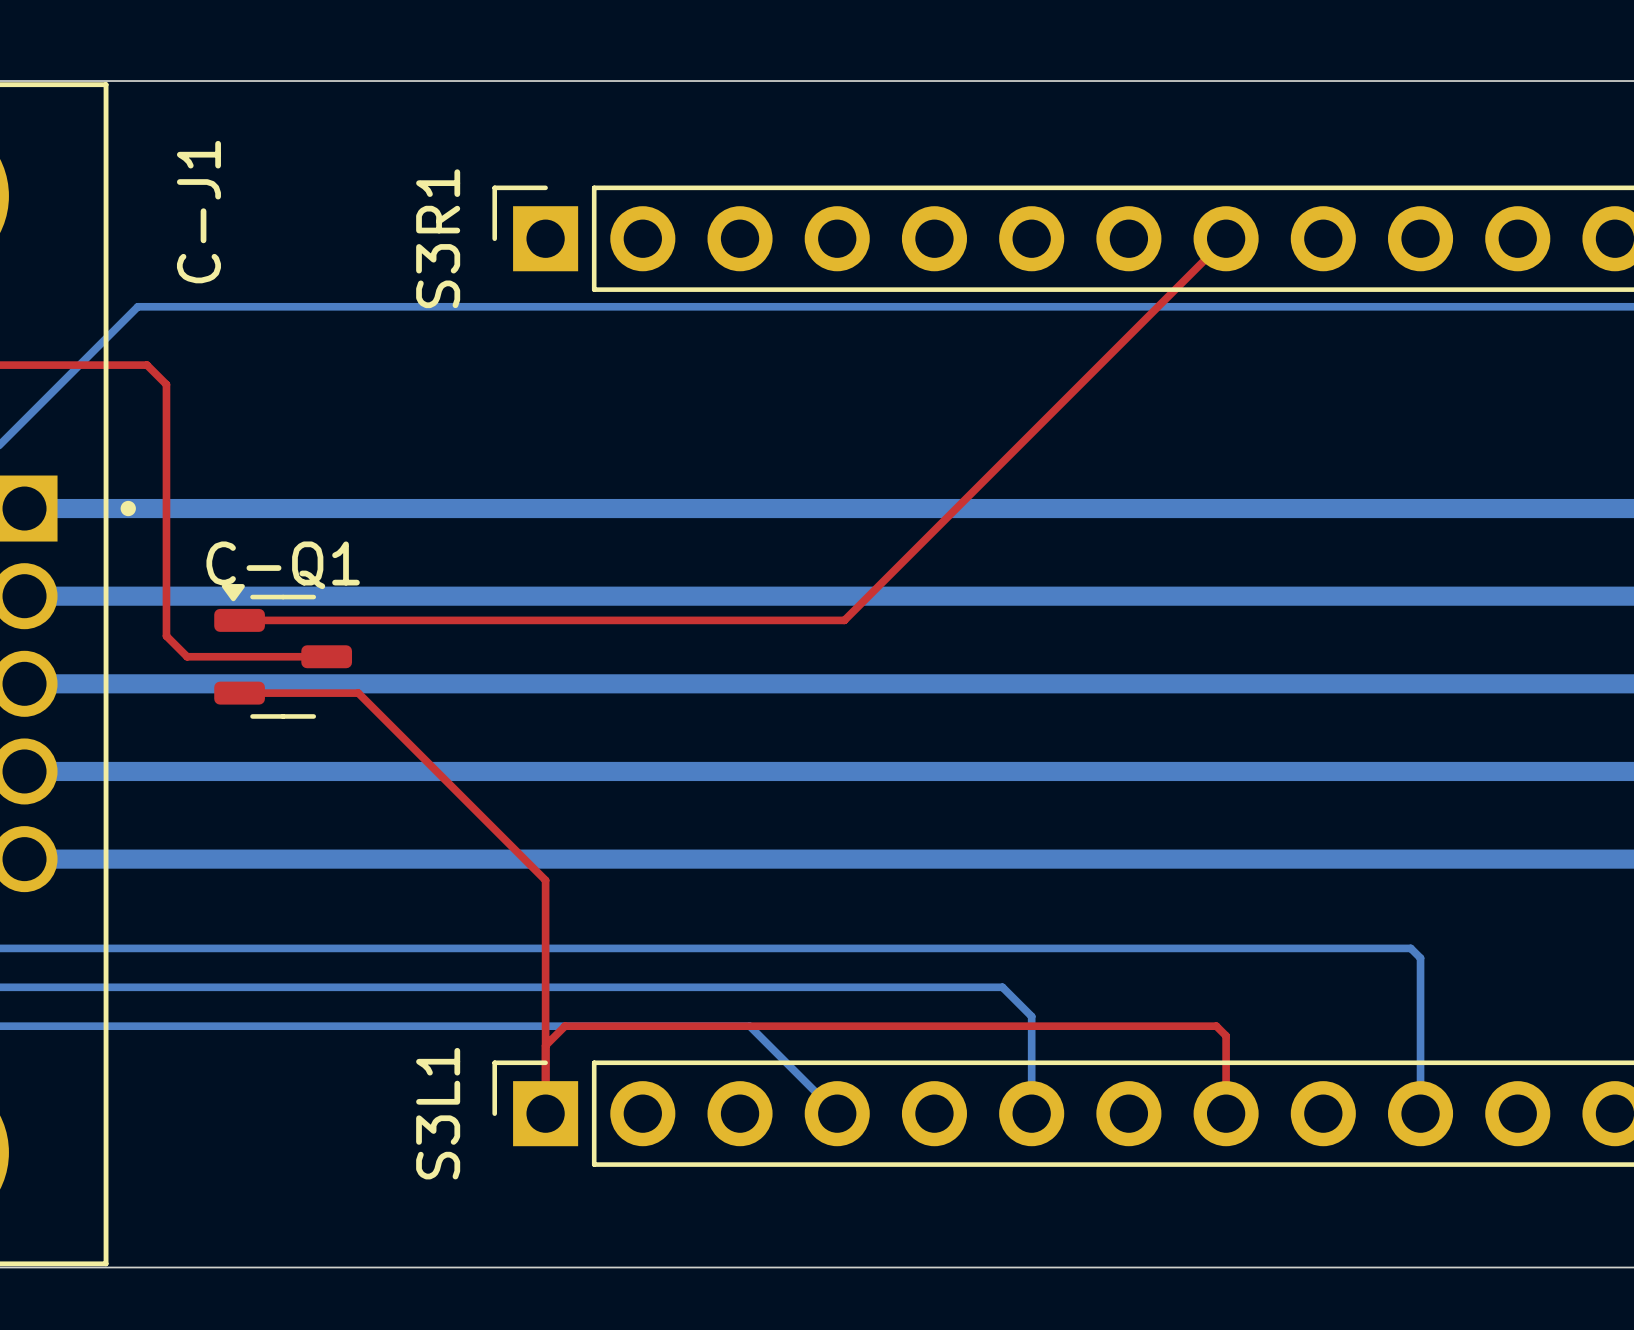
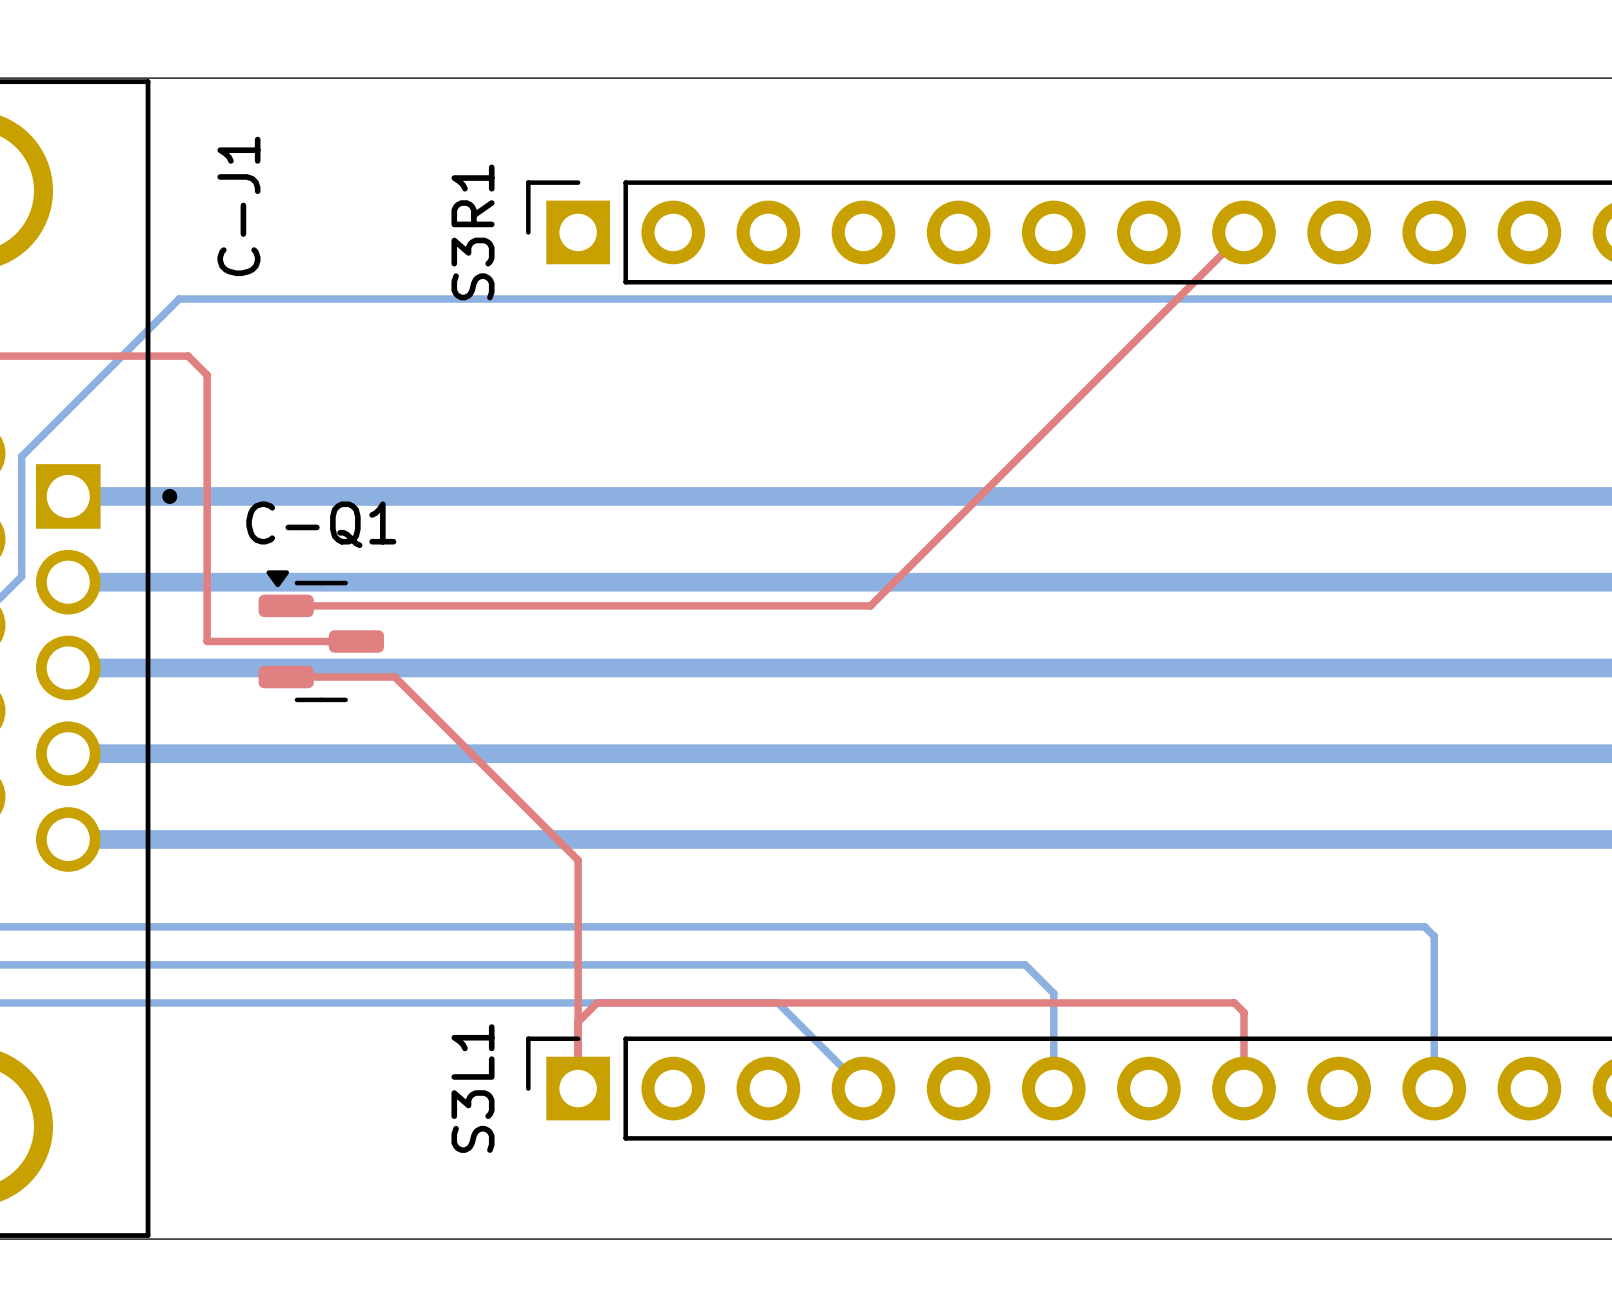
C-Q1 name position: C-Q1 (283, 565) -> C-Q1 (321, 524)
C-Q1 footprint: [214, 584, 353, 719] -> [258, 570, 385, 703]
top track: (166, 636) (187, 656) -> (207, 621) (207, 641) (227, 641)

